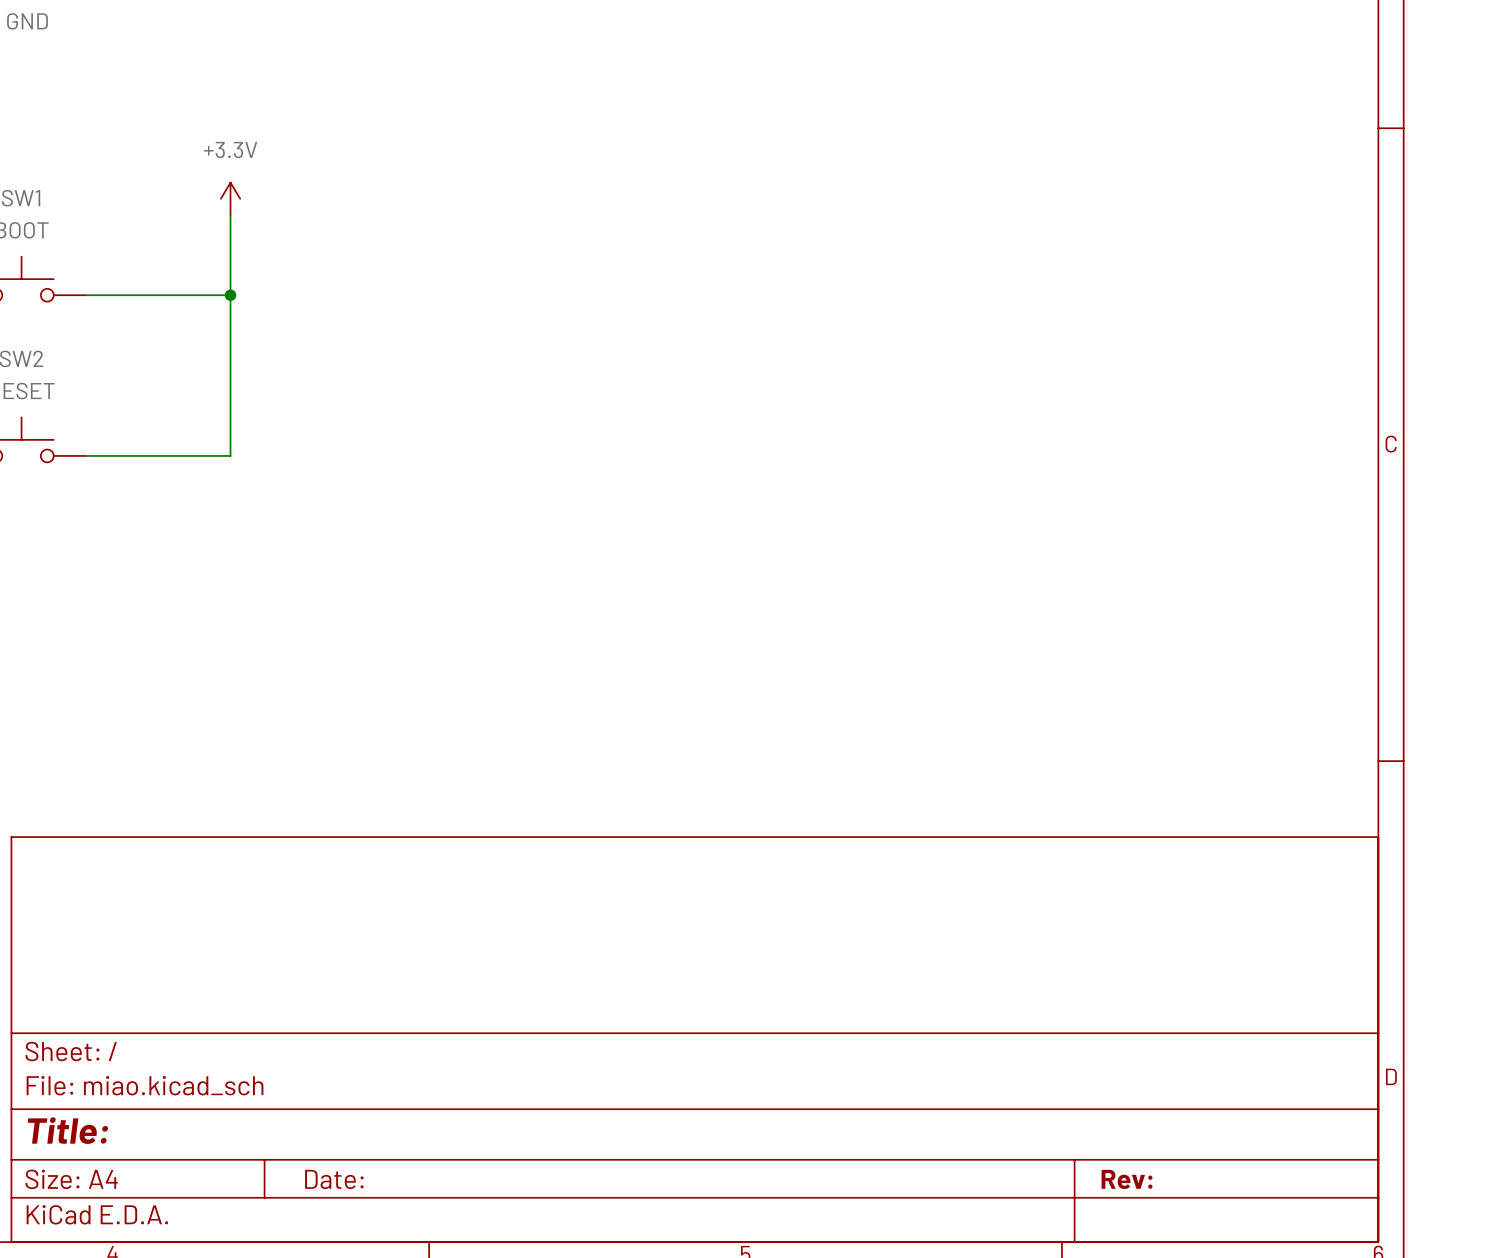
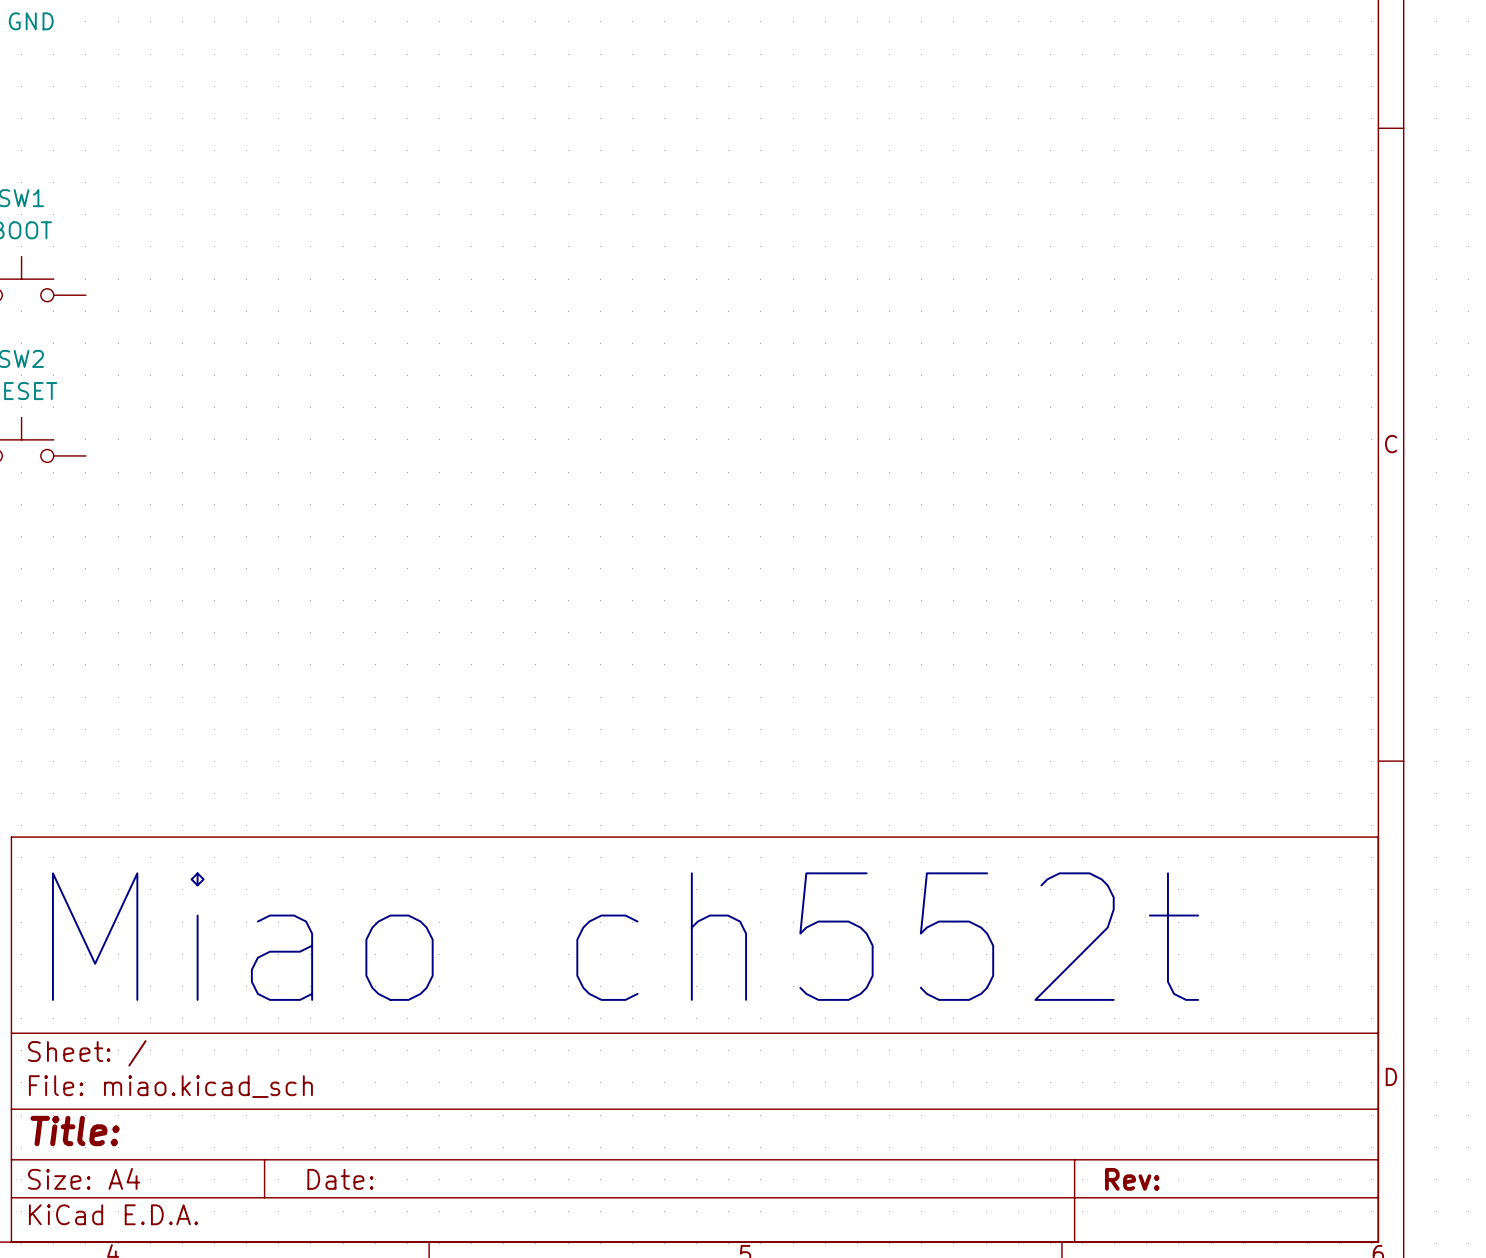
power symbol: +3.3V (230, 198) -> none
wire: (230, 214) (230, 455) (85, 455) -> none
wire: (85, 295) (230, 295) -> none
junction: (230, 295) -> none
text: none -> Miao ch552t (625, 936)

